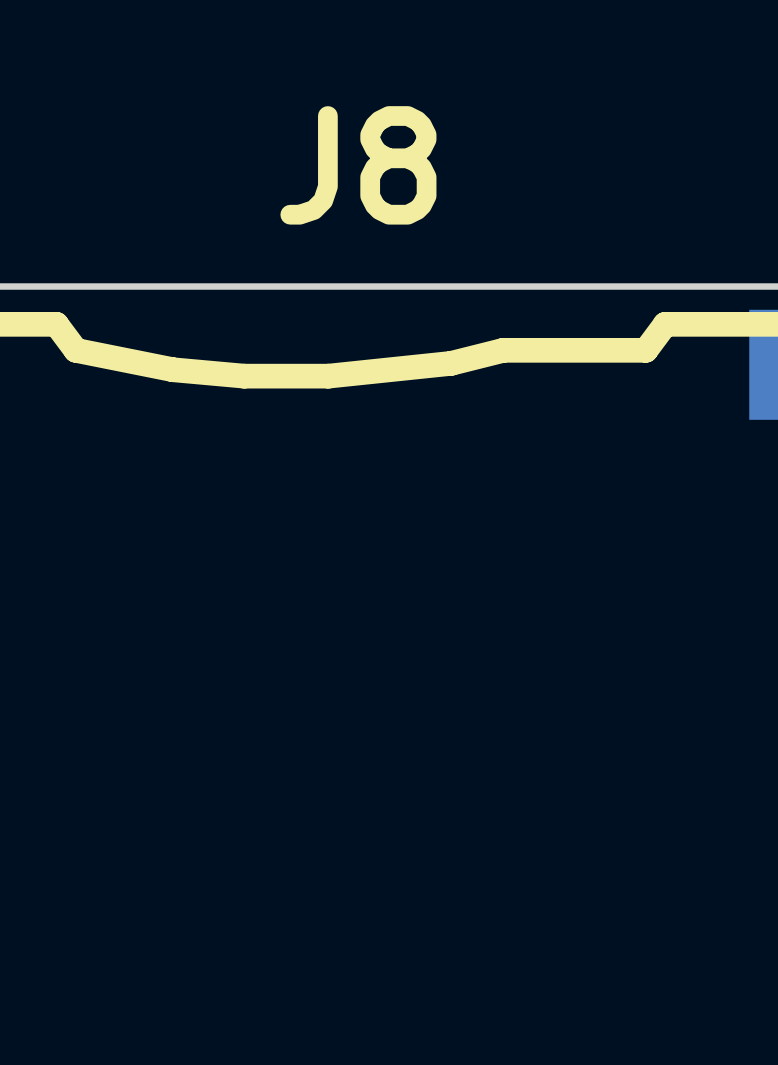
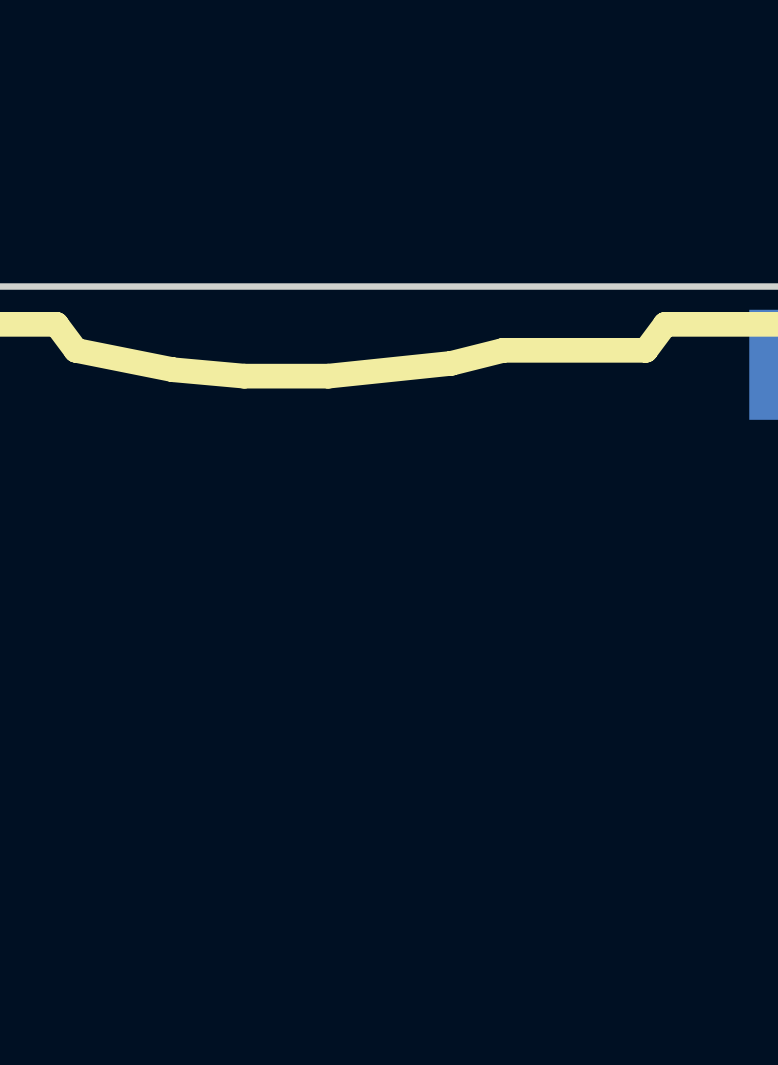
J8 name: J8 (358, 165) -> none

